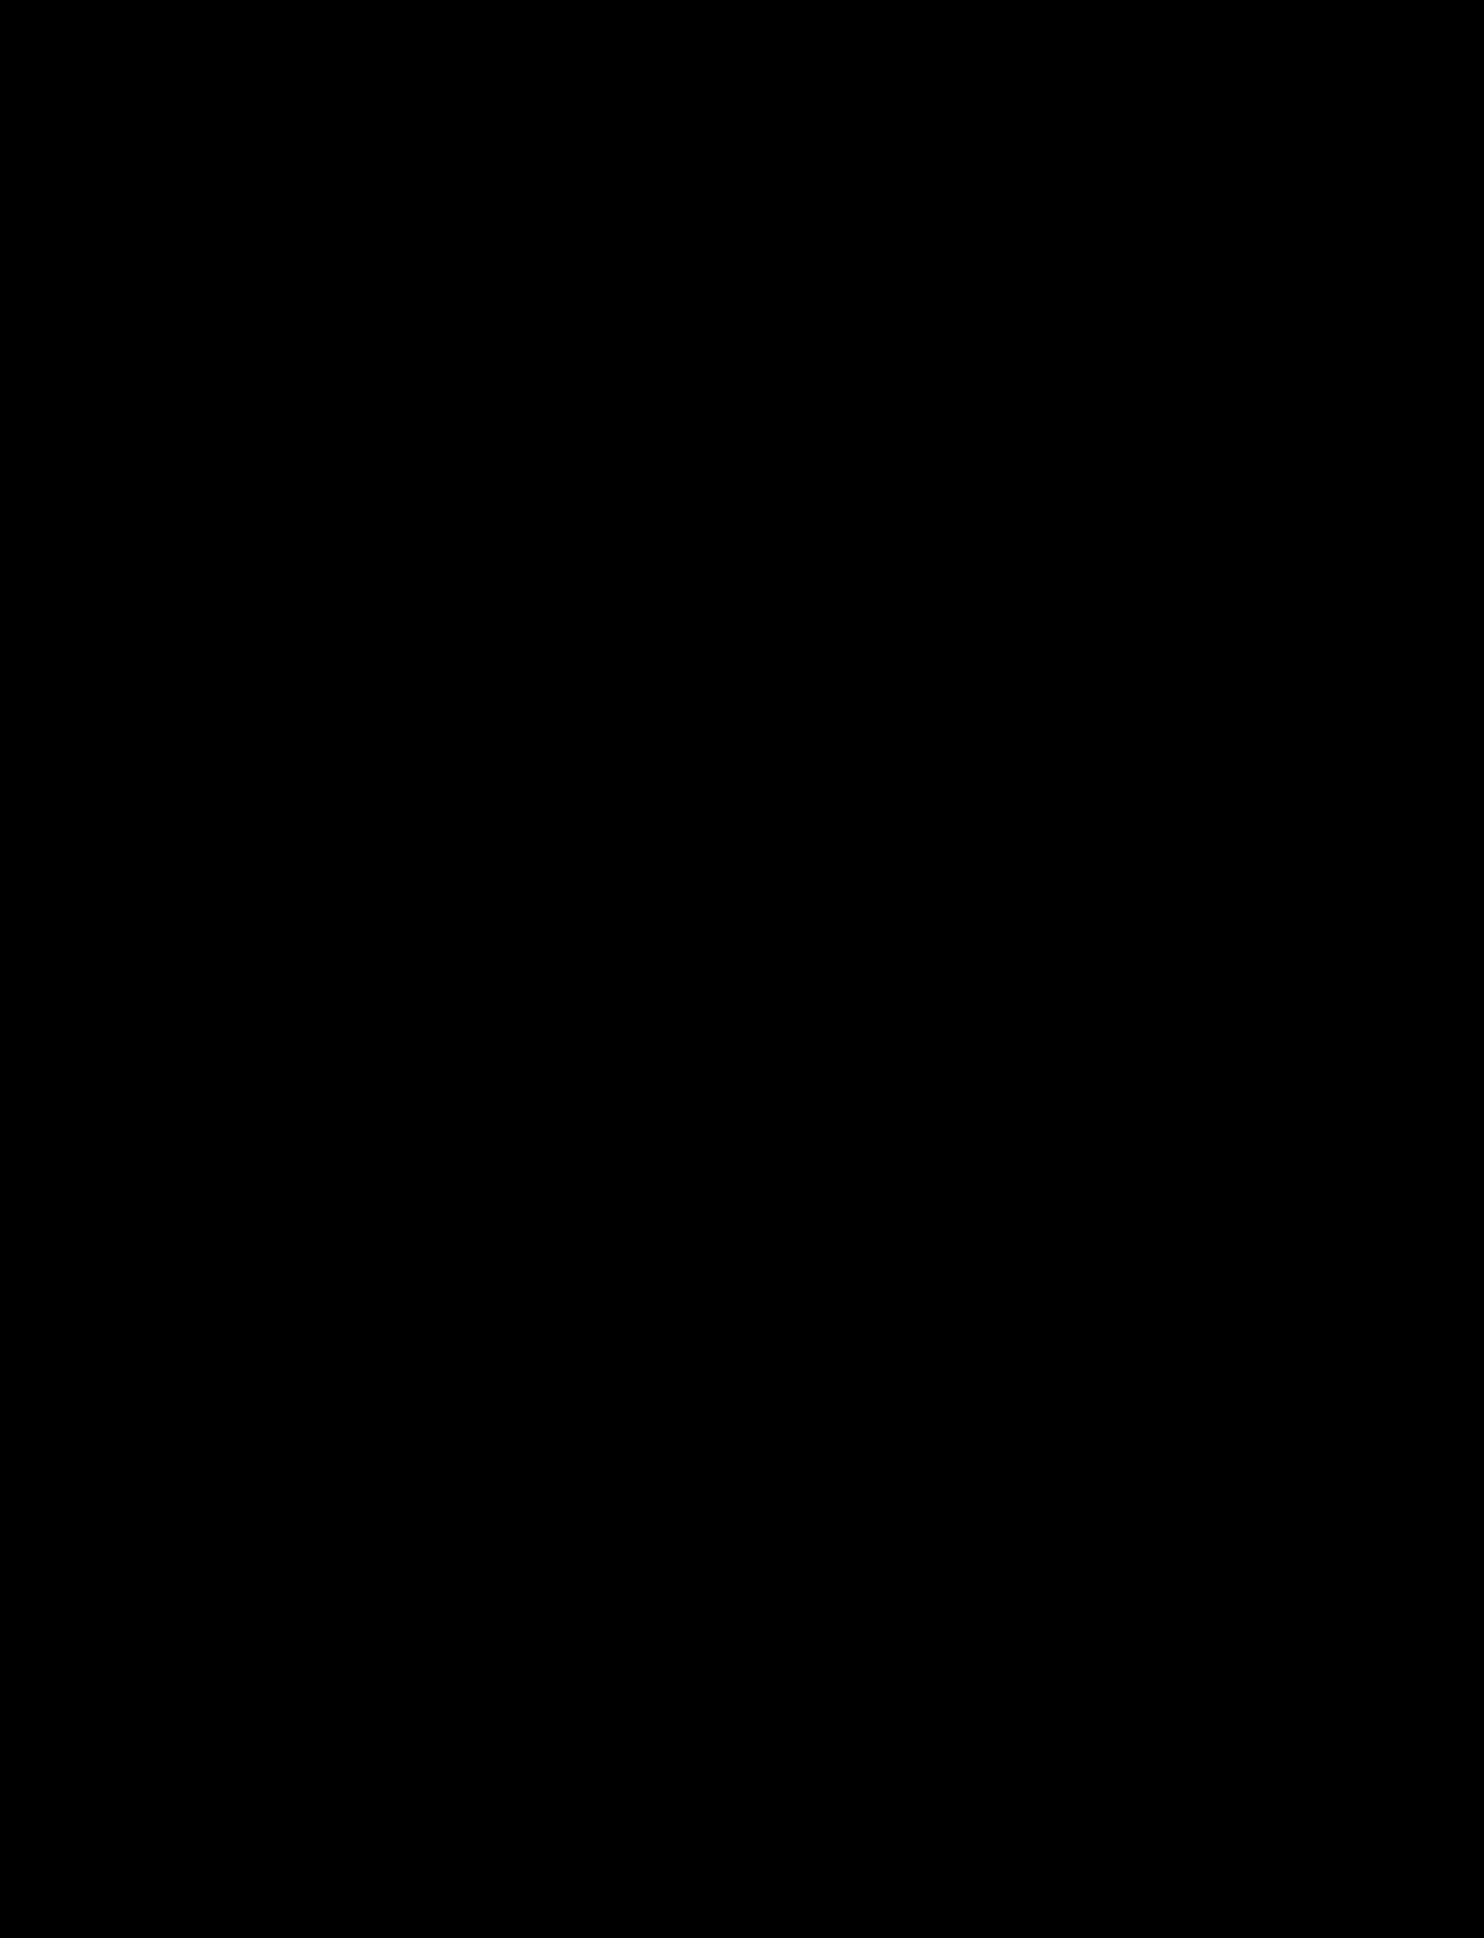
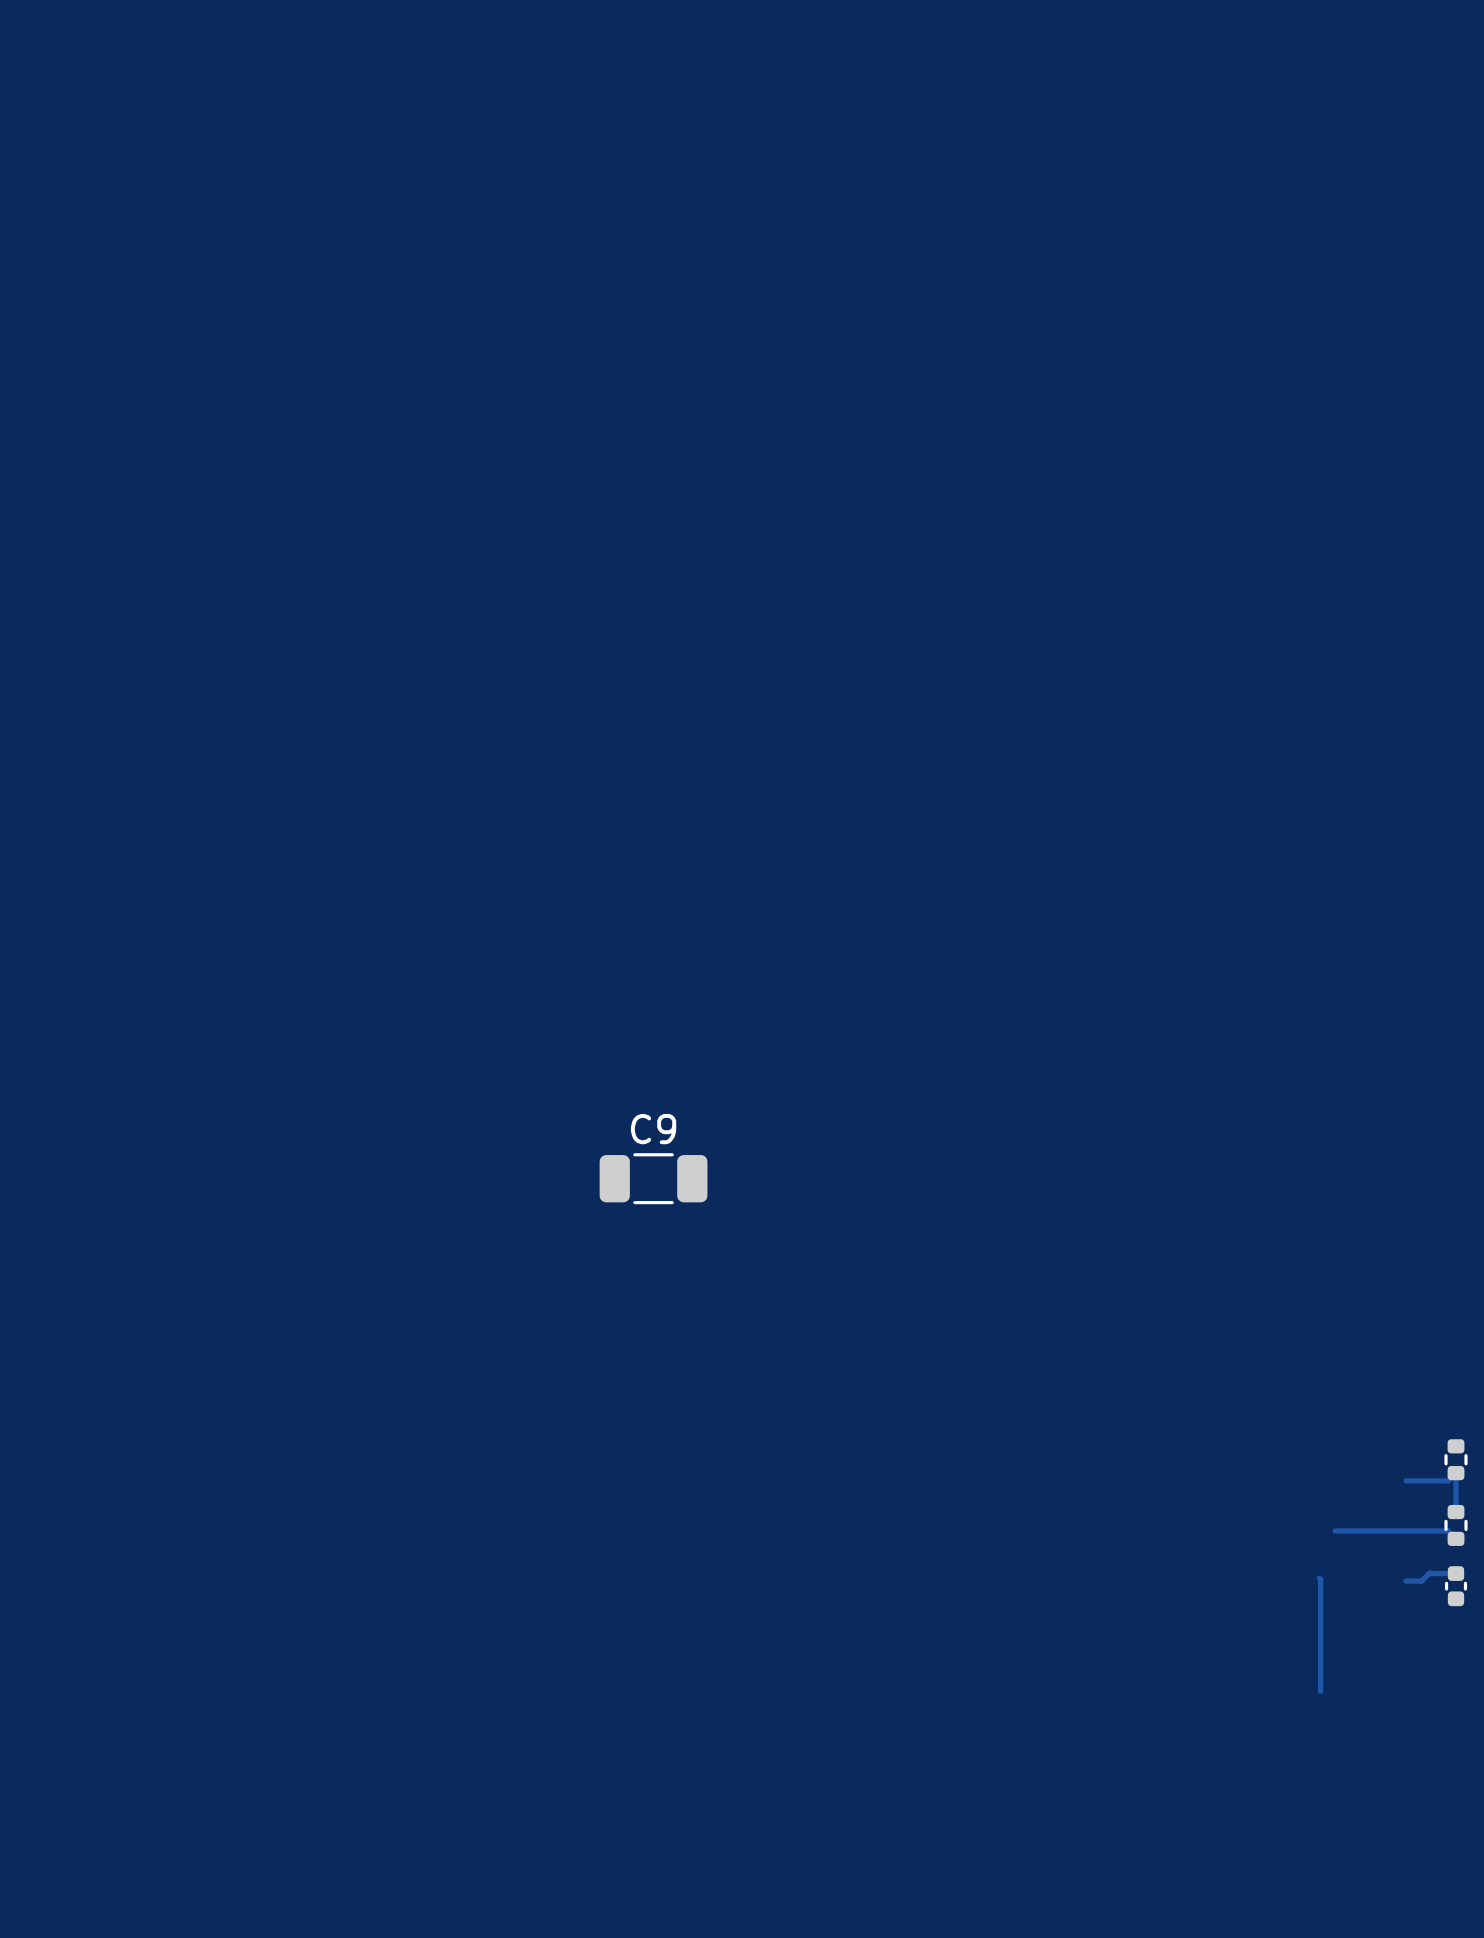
C9: none -> (653, 1178)
part: none -> (1456, 1459)
track: none -> (1406, 1480) (1448, 1480) (1456, 1473) (1456, 1512)
part: none -> (1456, 1525)
track: none -> (1335, 1530) (1448, 1530) (1456, 1538)
track: none -> (1456, 1573) (1429, 1573) (1421, 1581) (1406, 1581)
track: none -> (1319, 1578) (1320, 1691)
part: none -> (1456, 1586)

